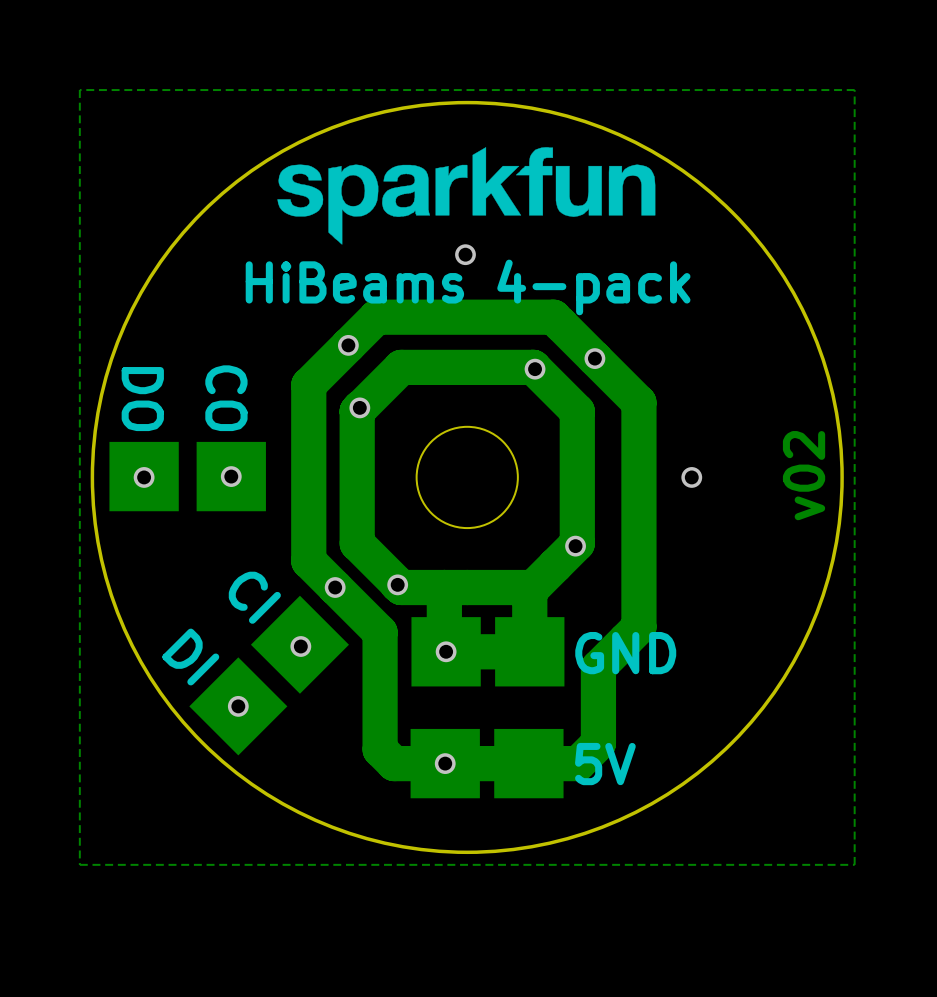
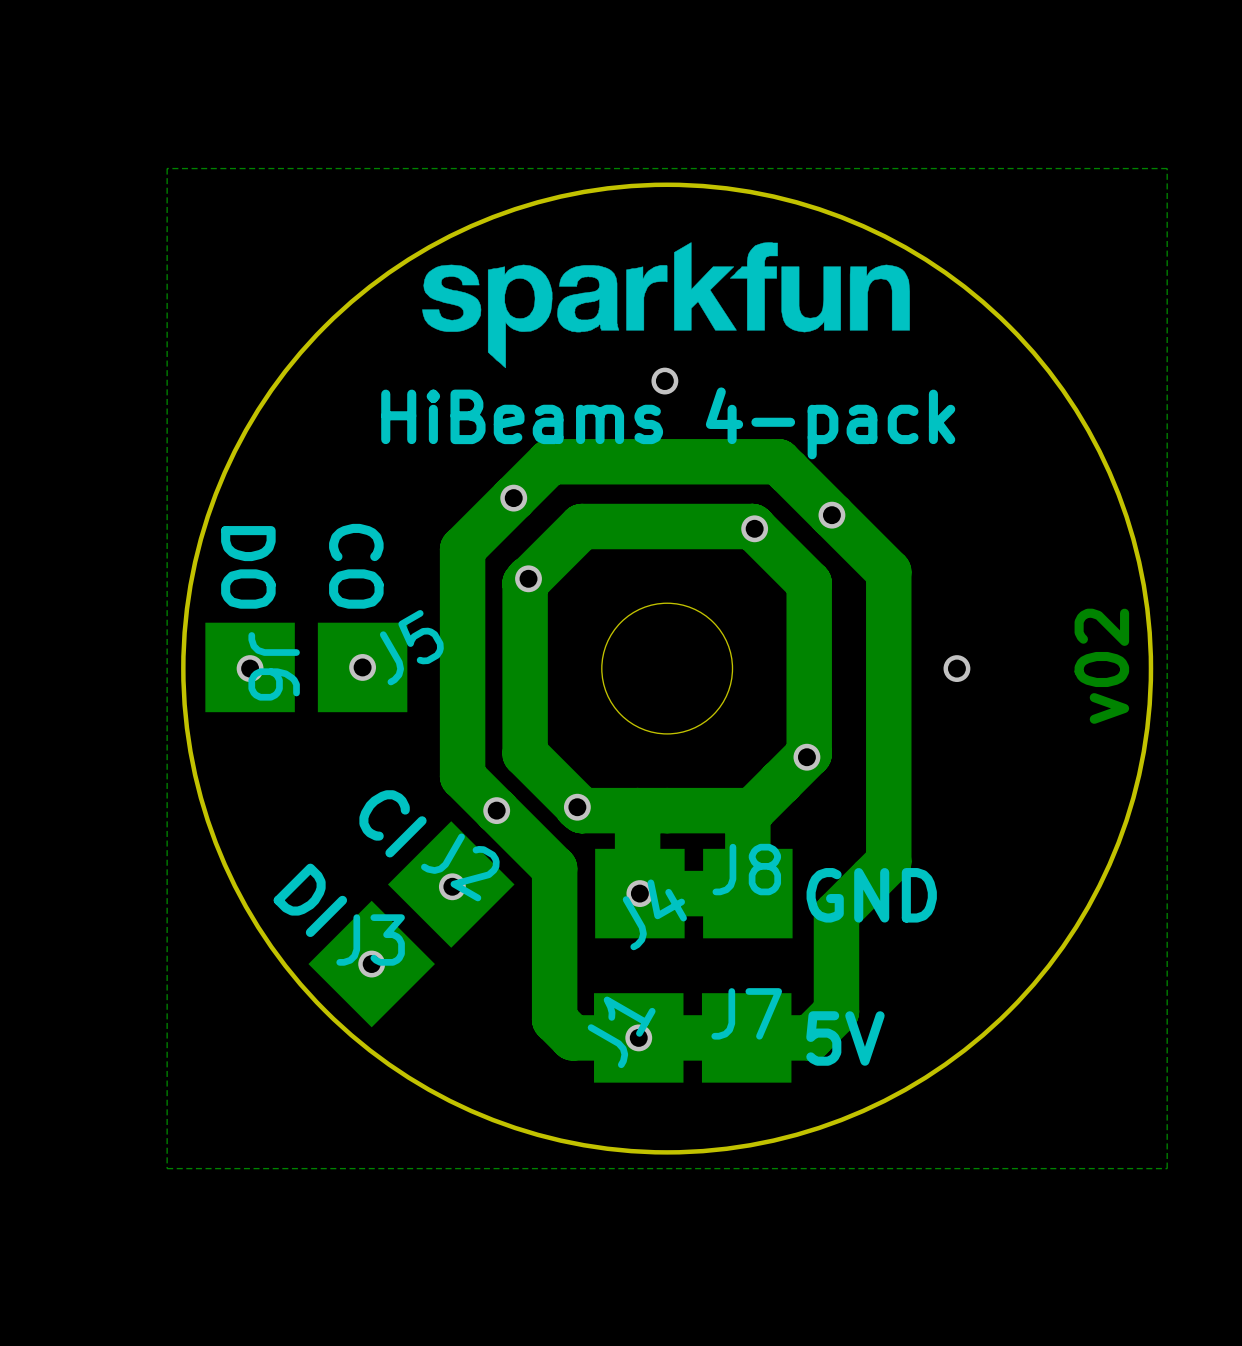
J5 name: none -> J5 (411, 647)
J6 name: none -> J6 (274, 666)
J2 name: none -> J2 (460, 867)
J8 name: none -> J8 (746, 869)
J4 name: none -> J4 (654, 914)
J3 name: none -> J3 (370, 940)
J7 name: none -> J7 (746, 1013)
J1 name: none -> J1 (621, 1032)

